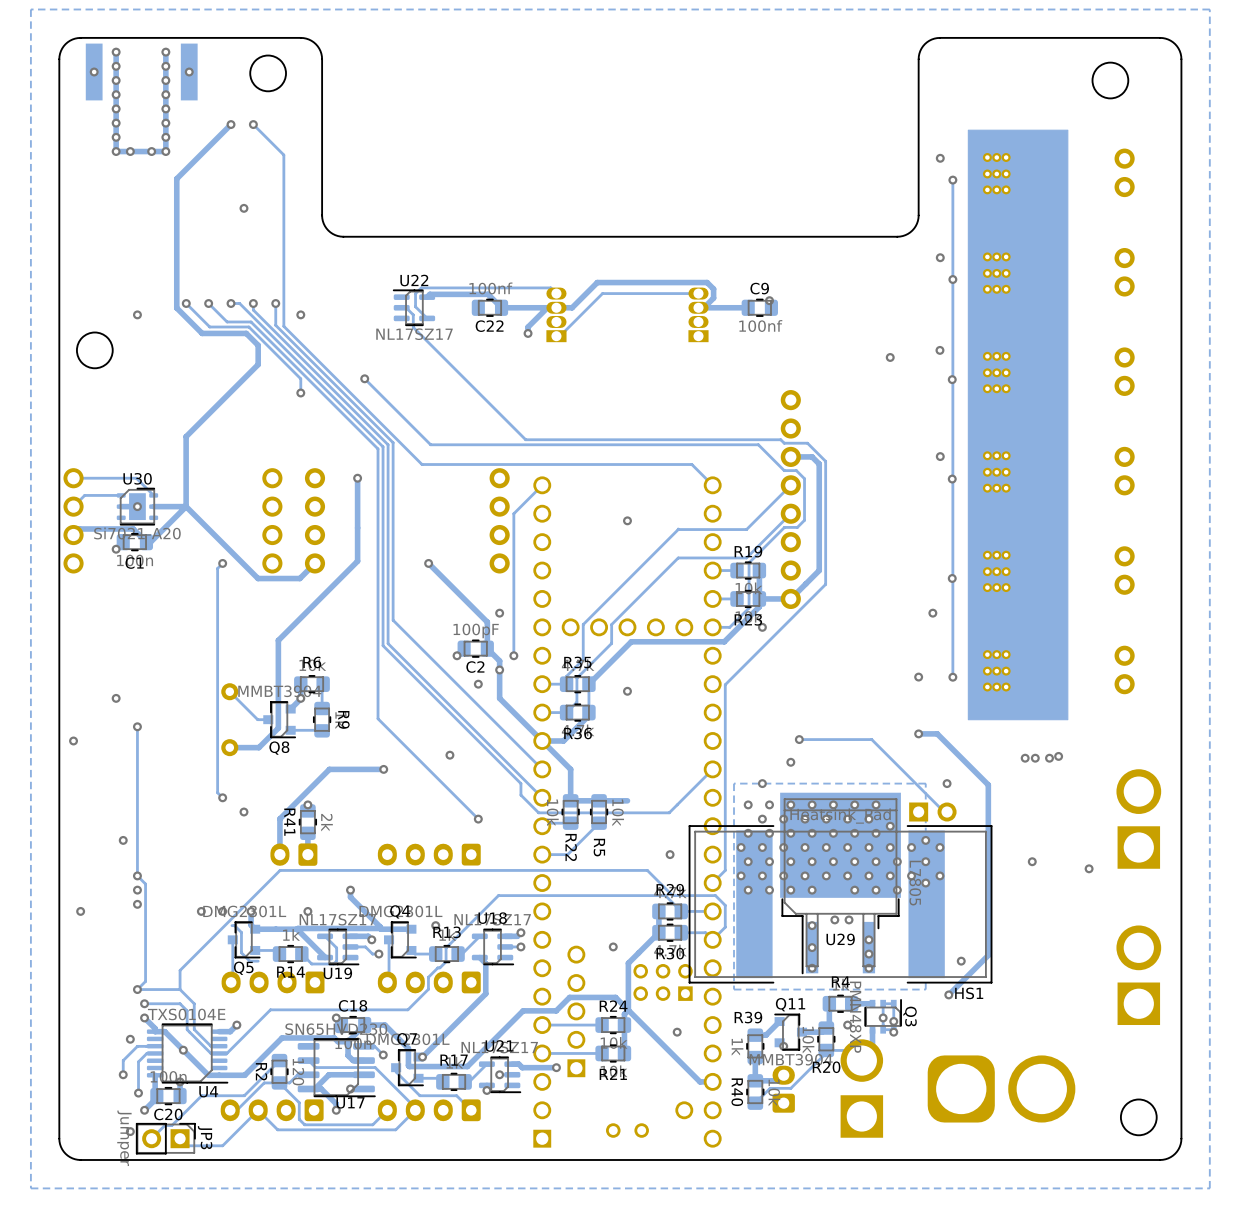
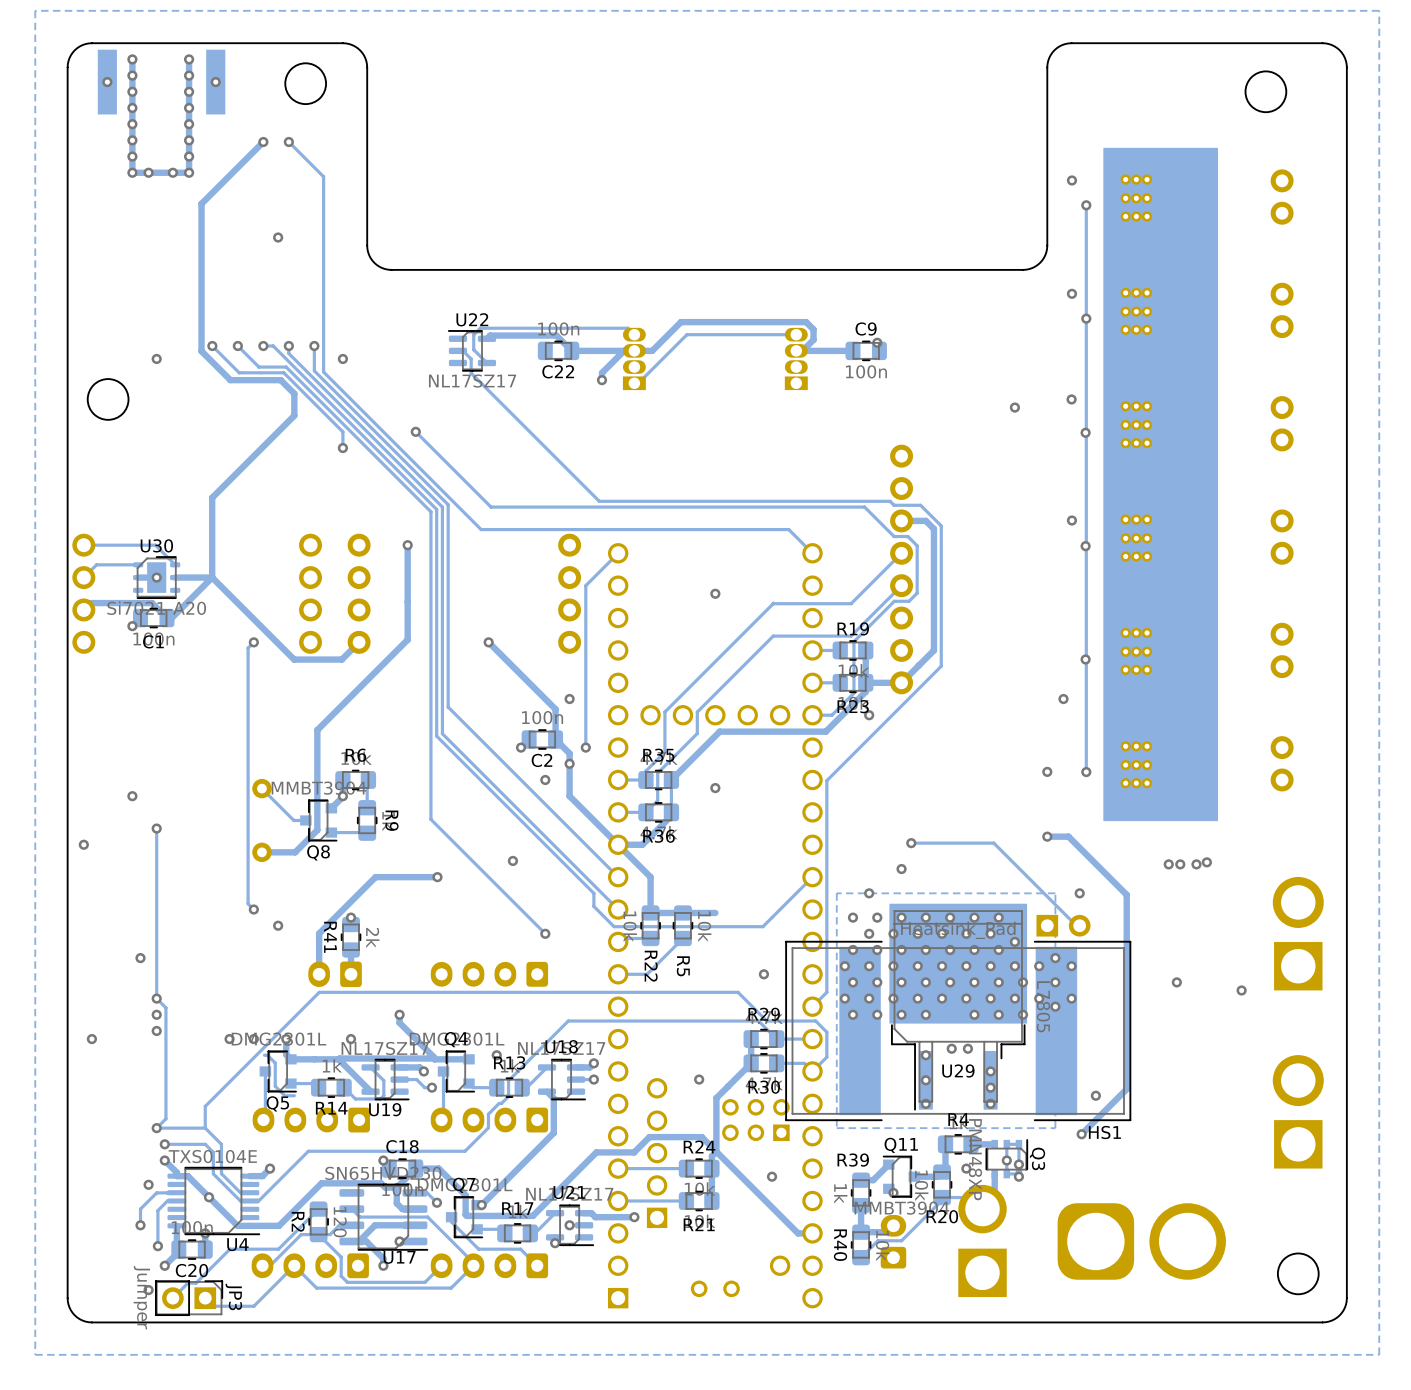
C22 value: 100nf (490, 288) -> 100n (558, 328)
C9 value: 100nf (760, 326) -> 100n (866, 371)
C2 value: 100pF (476, 630) -> 100n (542, 717)

